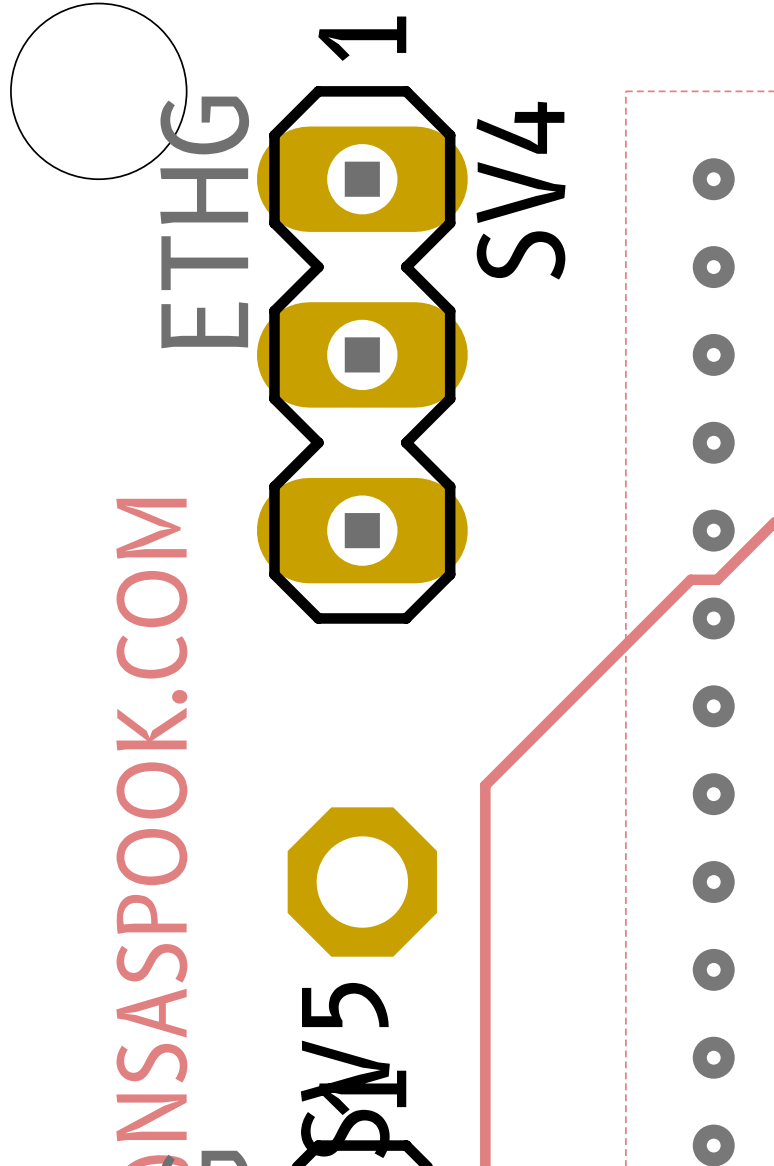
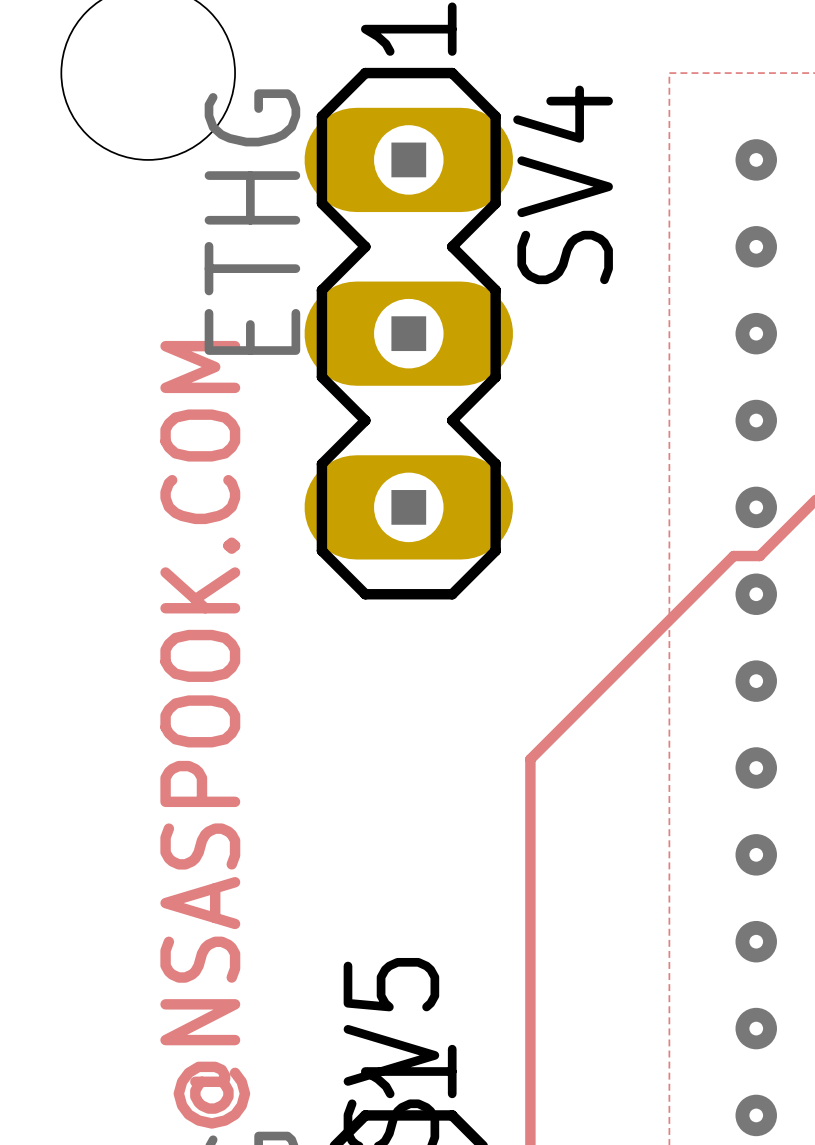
part: (362, 882) -> none

